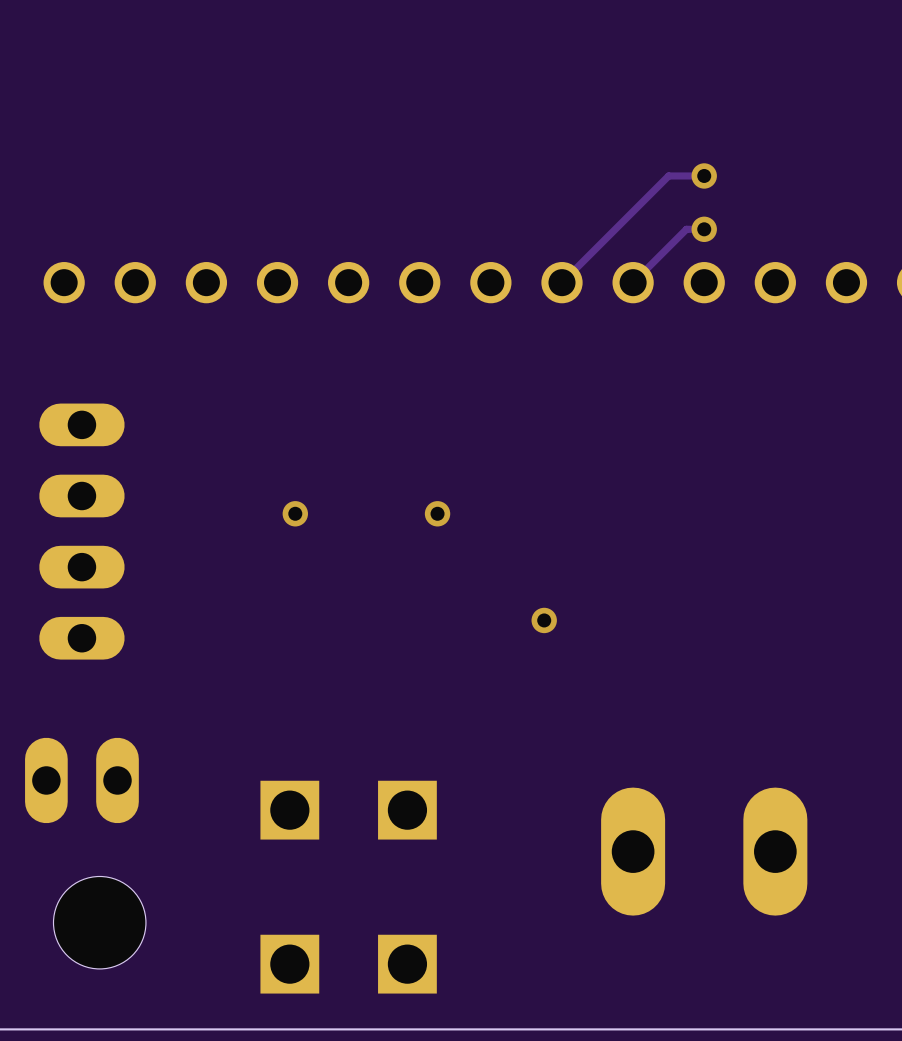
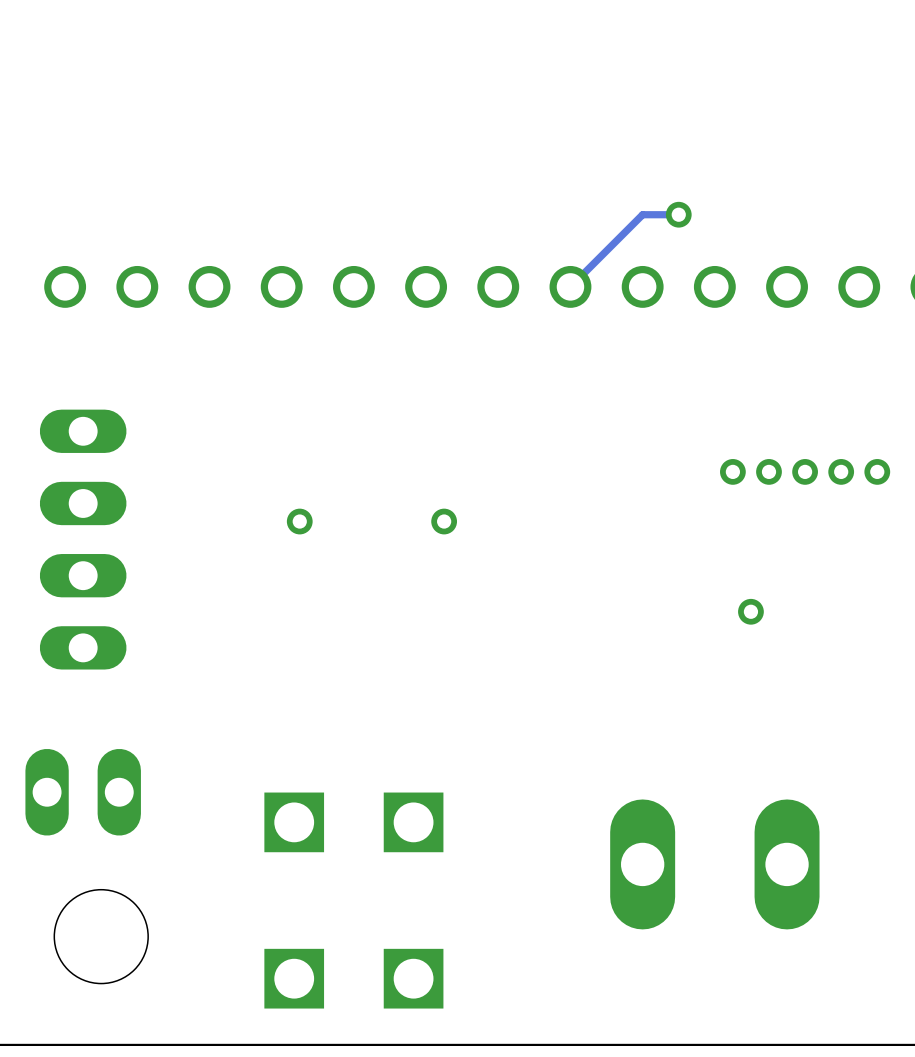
track: (704, 175) (668, 175) (633, 211) -> (678, 214) (642, 214)
via: (704, 175) -> none
via: none -> (678, 214)
track: (704, 229) (686, 229) (633, 282) -> none
via: (704, 229) -> none
via: none -> (732, 471)
via: none -> (768, 471)
via: none -> (805, 471)
via: none -> (841, 471)
via: none -> (877, 471)
via: none -> (750, 611)
via: (544, 620) -> none

